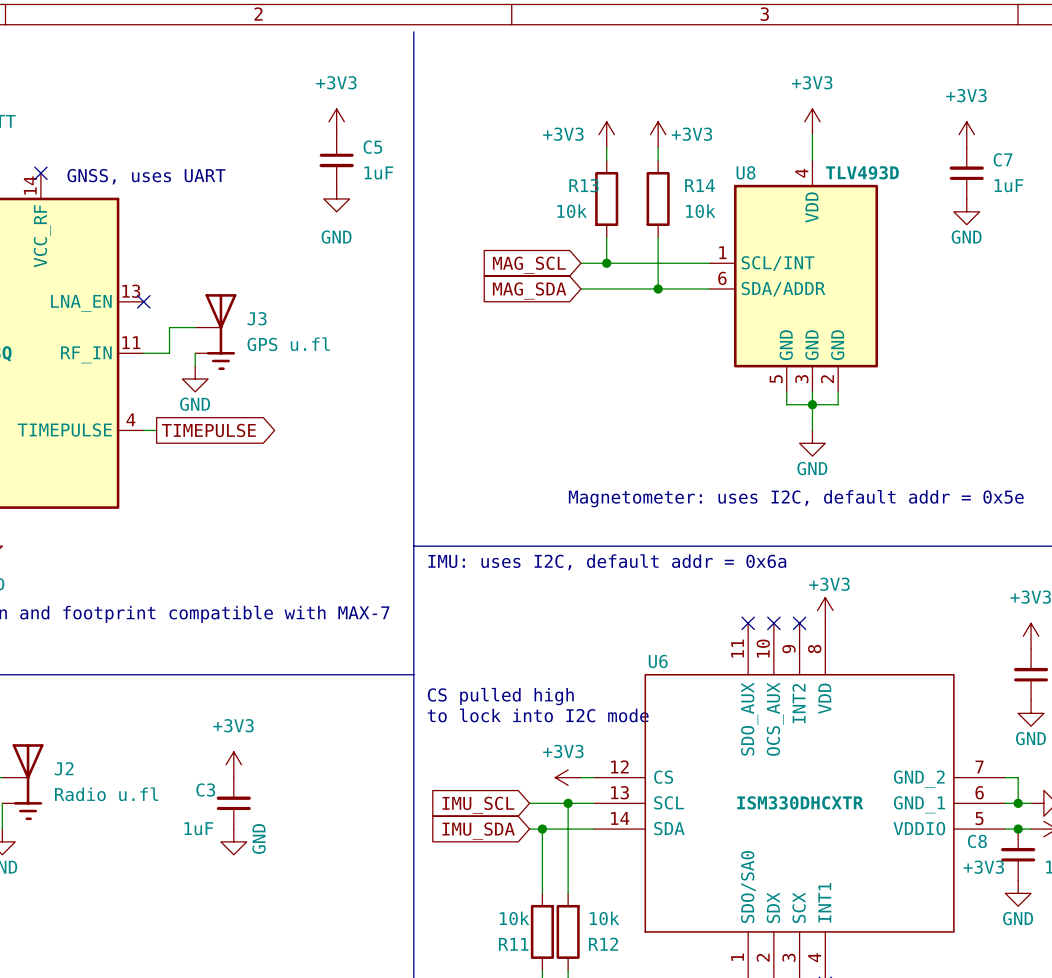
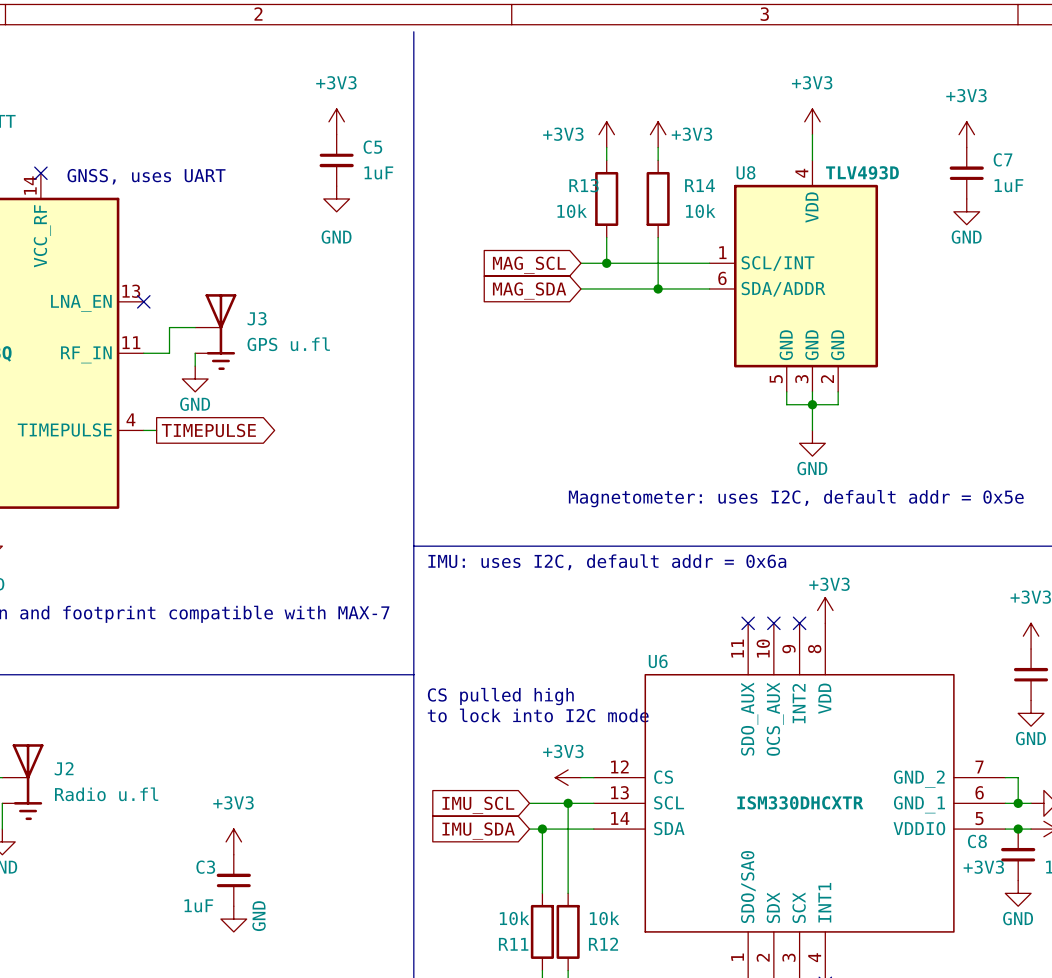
power symbol: +3V3 (233, 764) -> none
C3 position: (233, 803) -> (233, 880)
power symbol: GND (233, 841) -> +3V3 (233, 841)
power symbol: none -> GND (233, 919)

